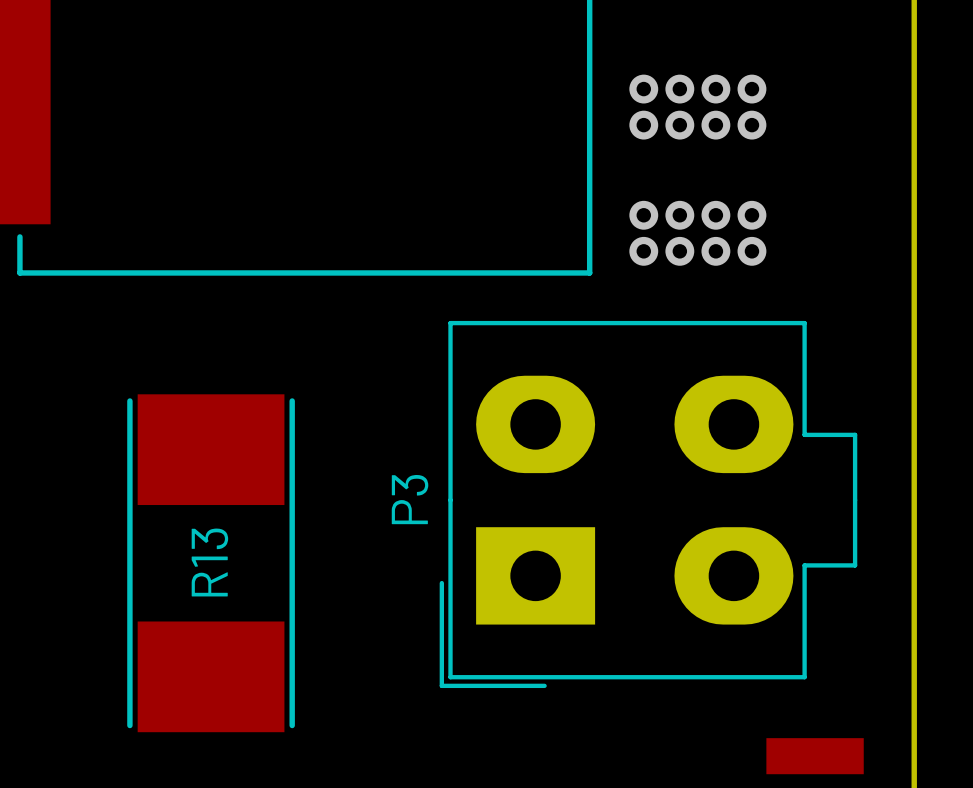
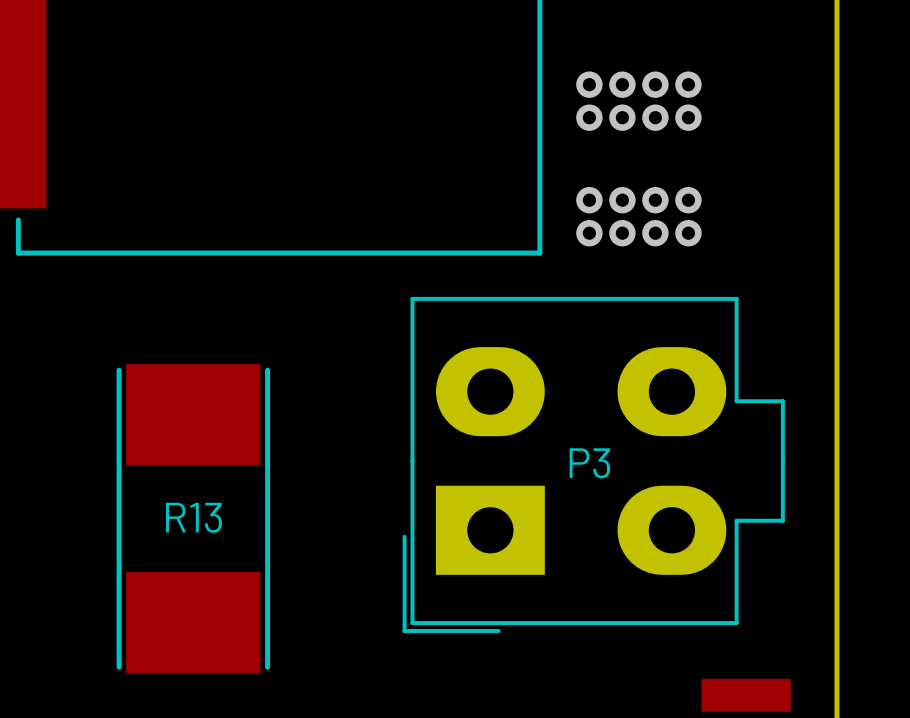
P3 name rotation: 0° (410, 499) -> 90° clockwise (589, 463)
P3 name position: P3 (410, 499) -> P3 (589, 463)
R13 name rotation: 0° (209, 562) -> 90° clockwise (193, 517)

